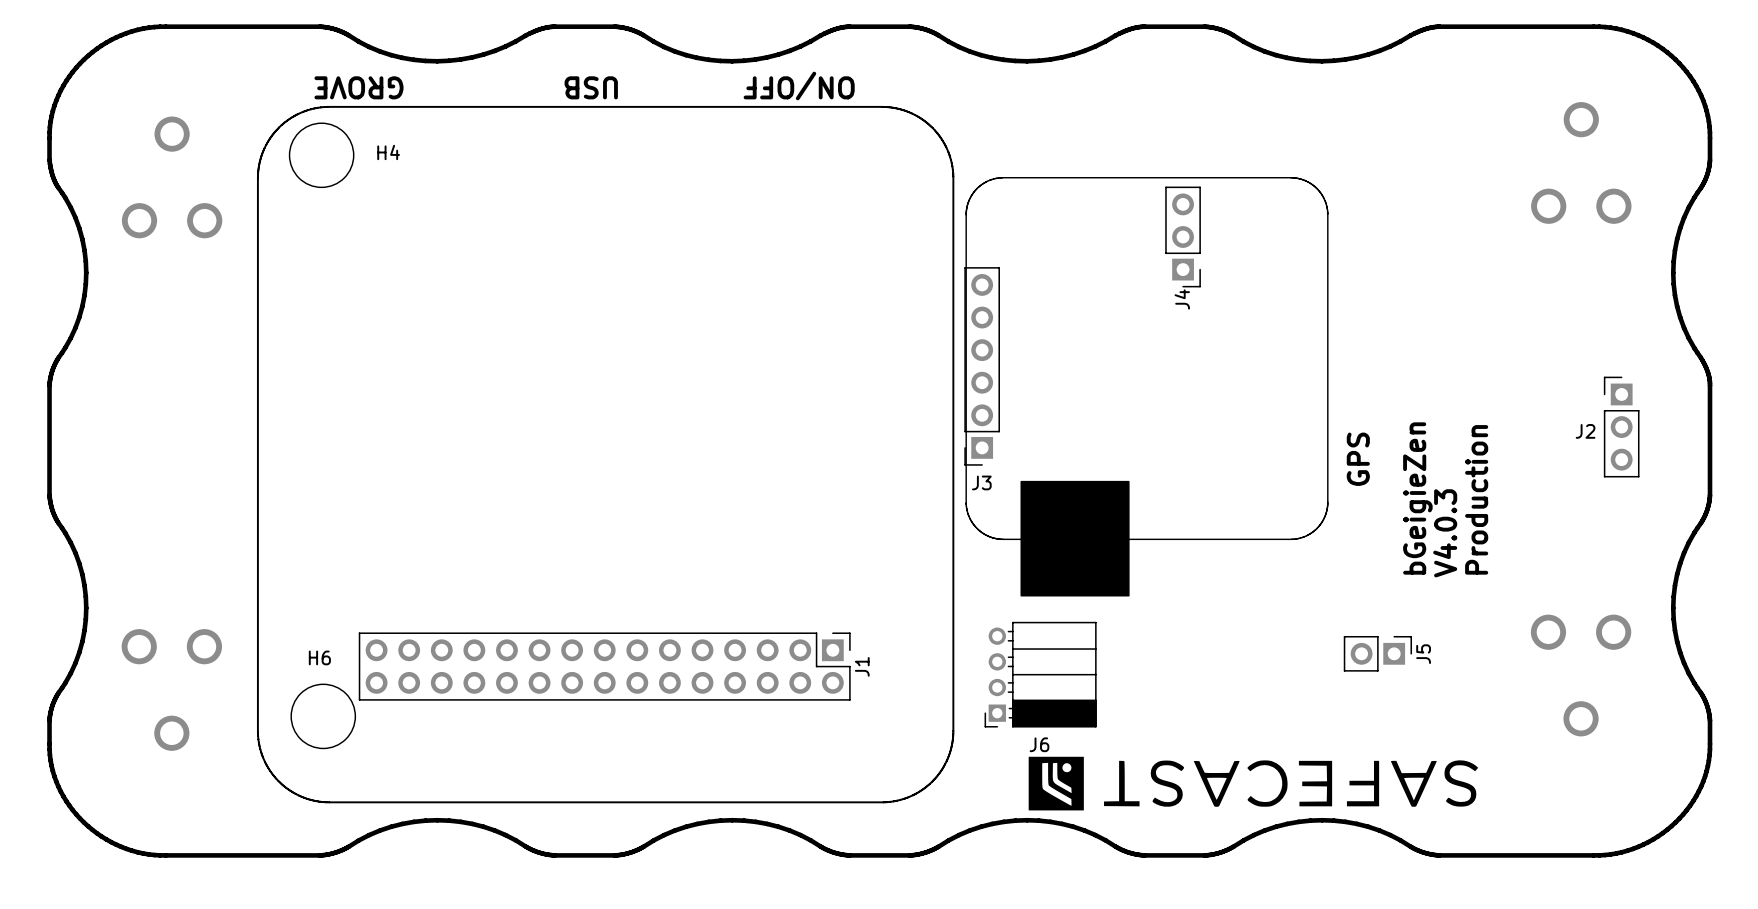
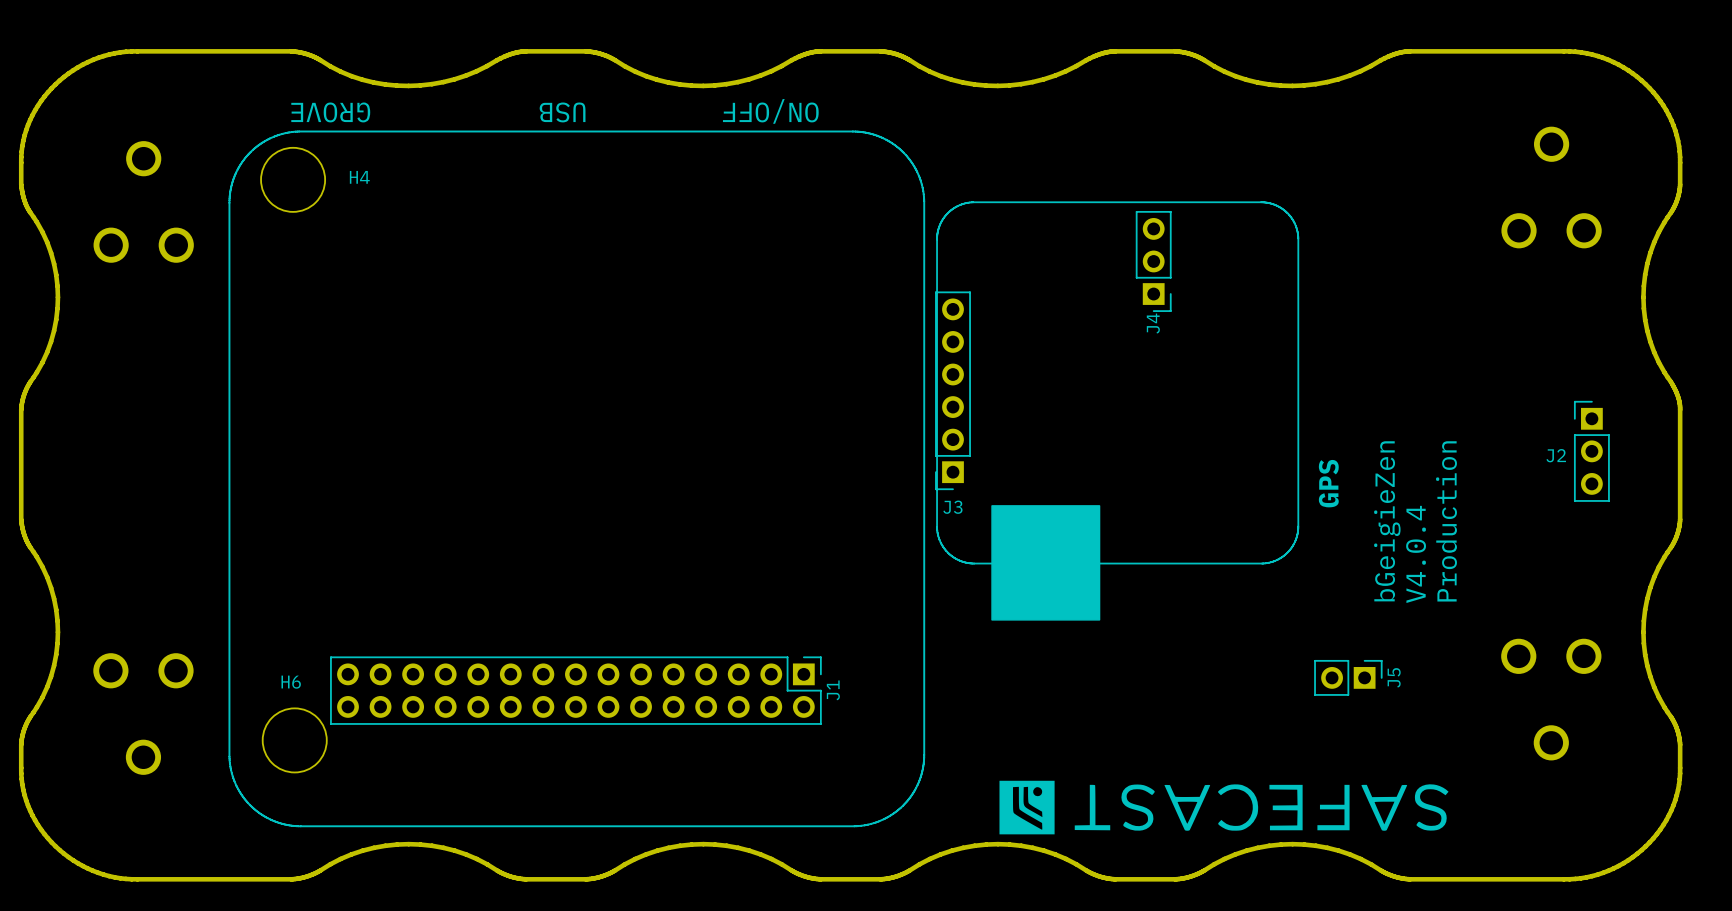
text: V4.0.3 (1445, 533) -> V4.0.4 (1416, 554)
J6: (1040, 674) -> none

